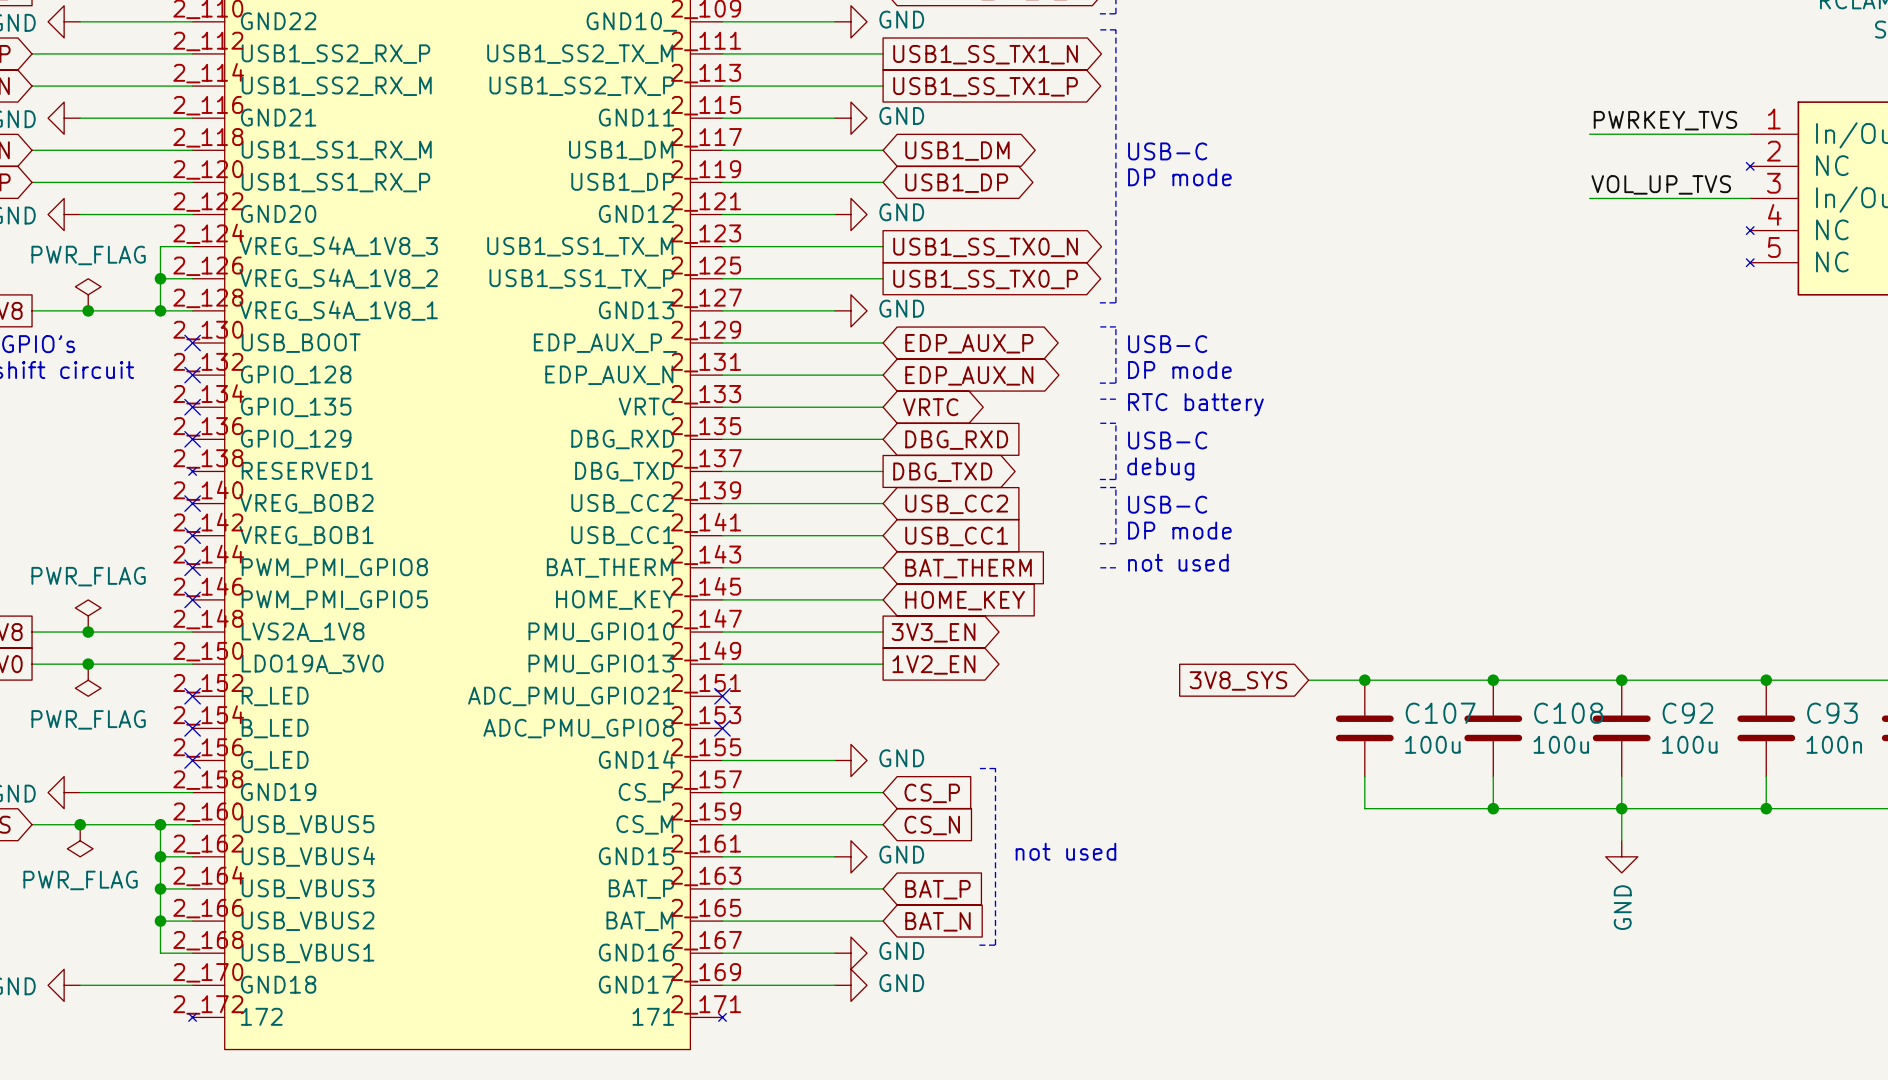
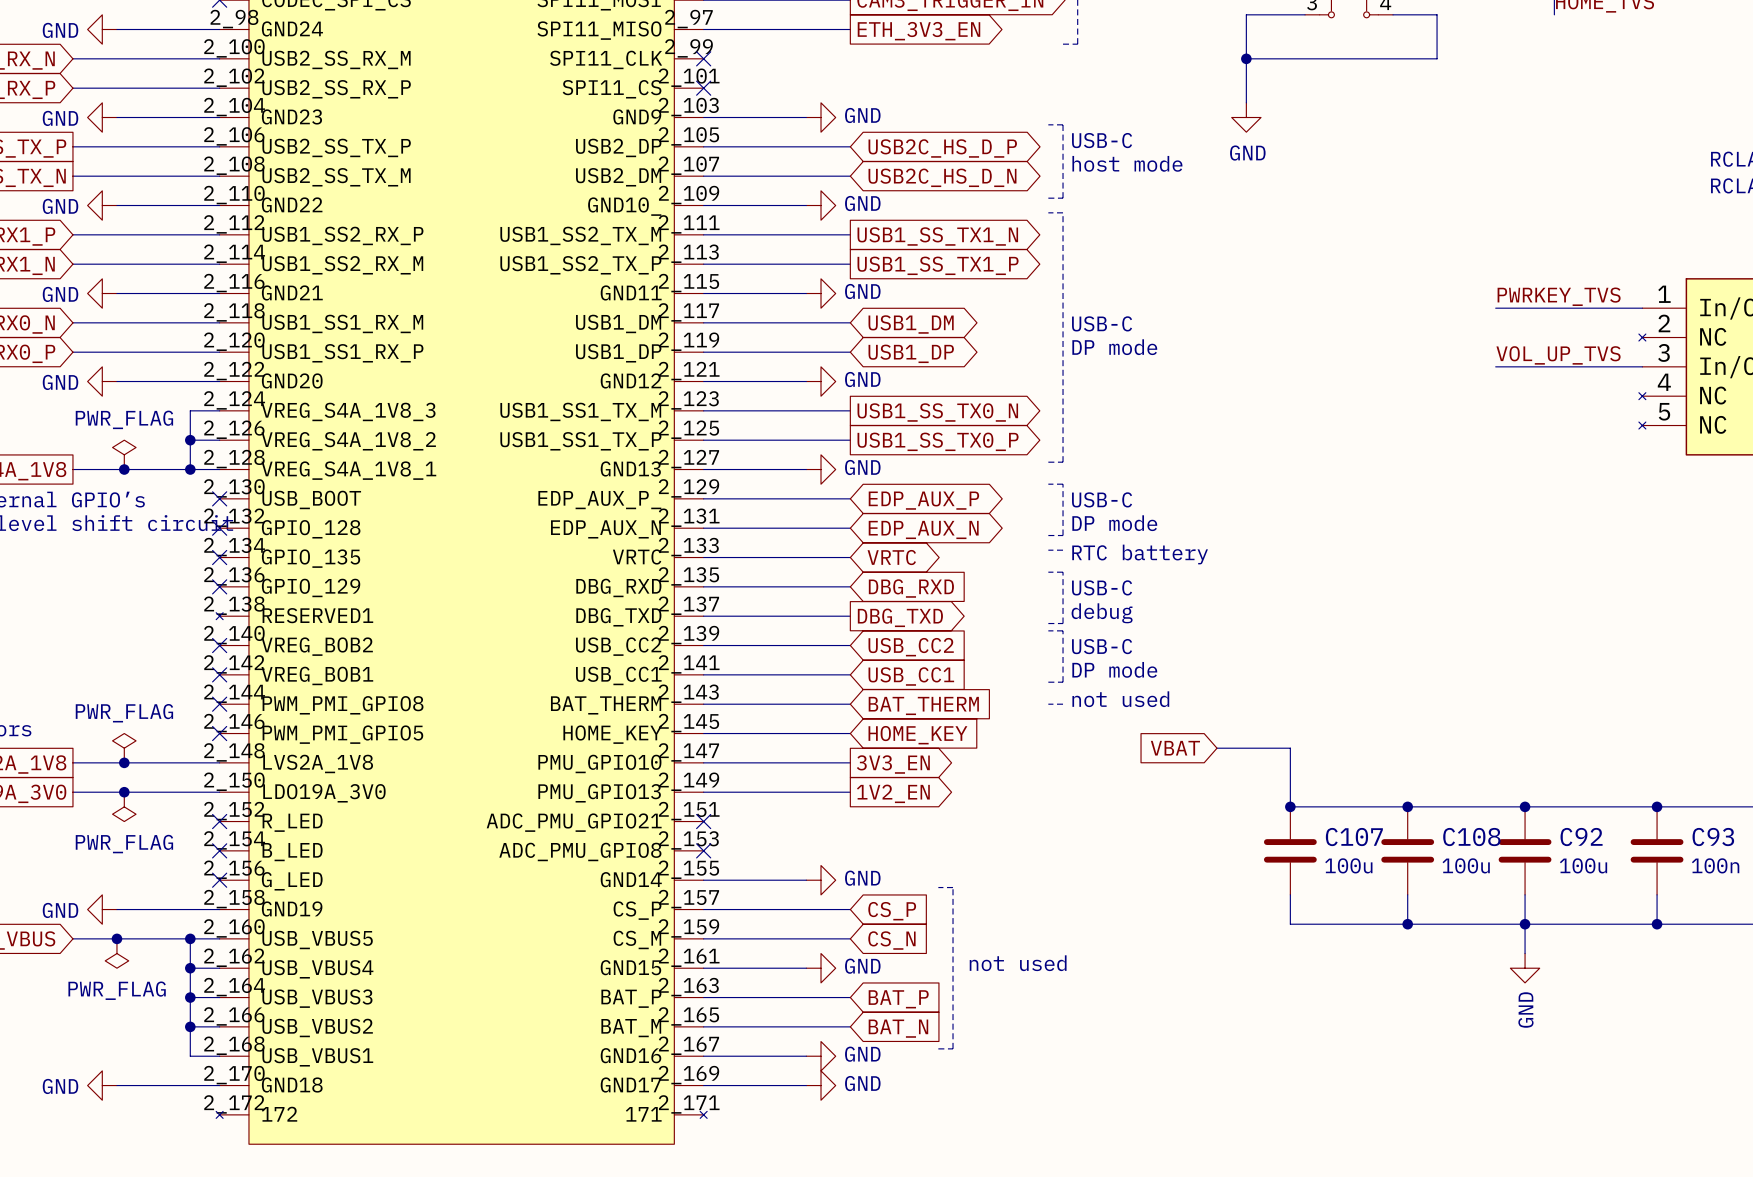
global label: none -> VBAT (1175, 748)
global label: 3V8_SYS (1238, 680) -> none
wire: (1308, 680) (1364, 680) -> (1217, 748) (1290, 748) (1290, 806)

